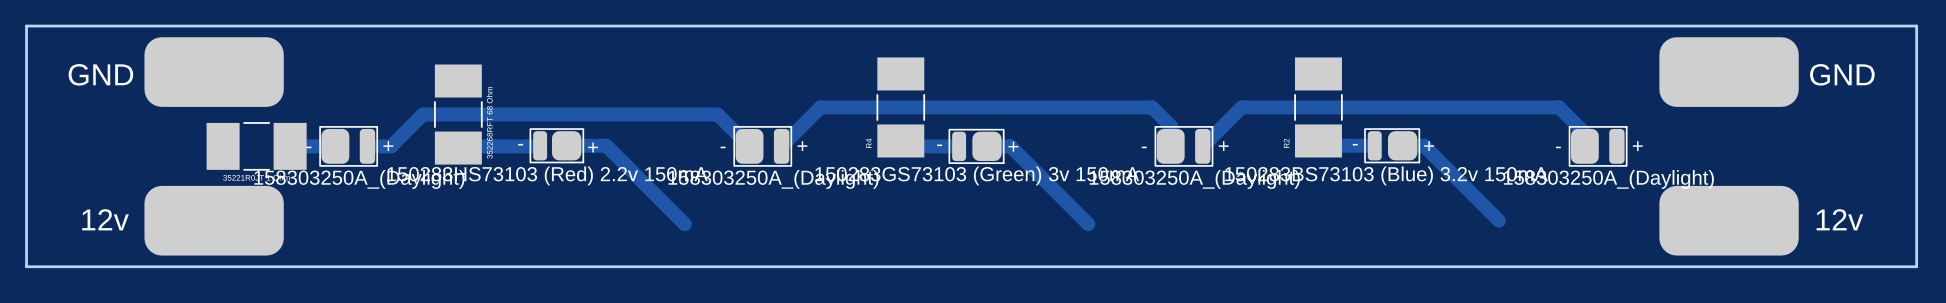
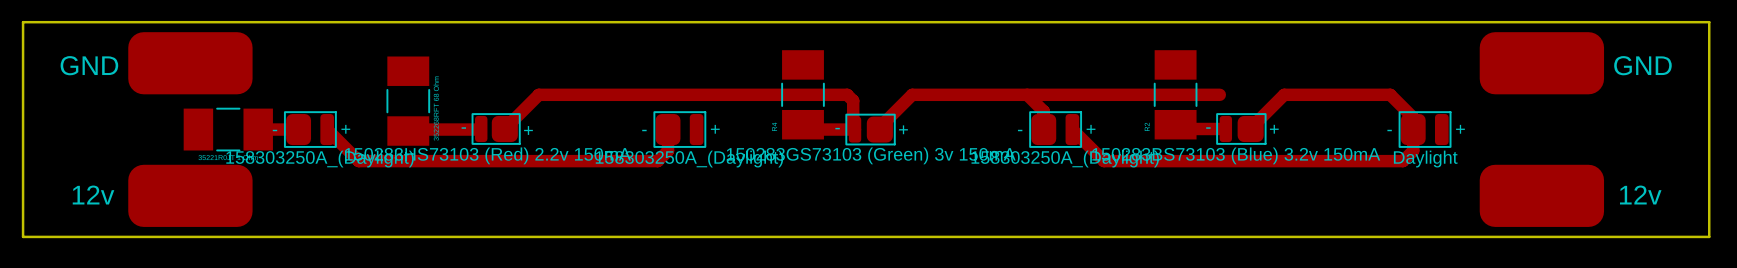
track: (820, 107) (781, 146) -> (731, 94) (538, 94) (504, 129)
track: (950, 107) (1023, 107) -> (878, 128) (912, 94)
track: none -> (847, 94) (853, 100) (853, 128)
track: (1241, 107) (1202, 146) -> (1107, 94) (1027, 94)
track: (1368, 107) (1440, 107) -> (1250, 128) (1284, 94)
track: (566, 145) (606, 145) (684, 224) -> none
track: (1402, 145) (1424, 145) (1498, 220) -> none
track: (367, 146) (391, 146) (422, 114) (717, 114) (749, 146) -> (327, 129) (358, 161) (657, 161) (668, 150) (668, 129)
track: (986, 146) (1010, 146) (1088, 224) -> none
track: none -> (1072, 129) (1103, 161) (1402, 161) (1413, 150) (1413, 129)
part value: 158303250A_(Daylight) (1608, 179) -> Daylight (1425, 159)

